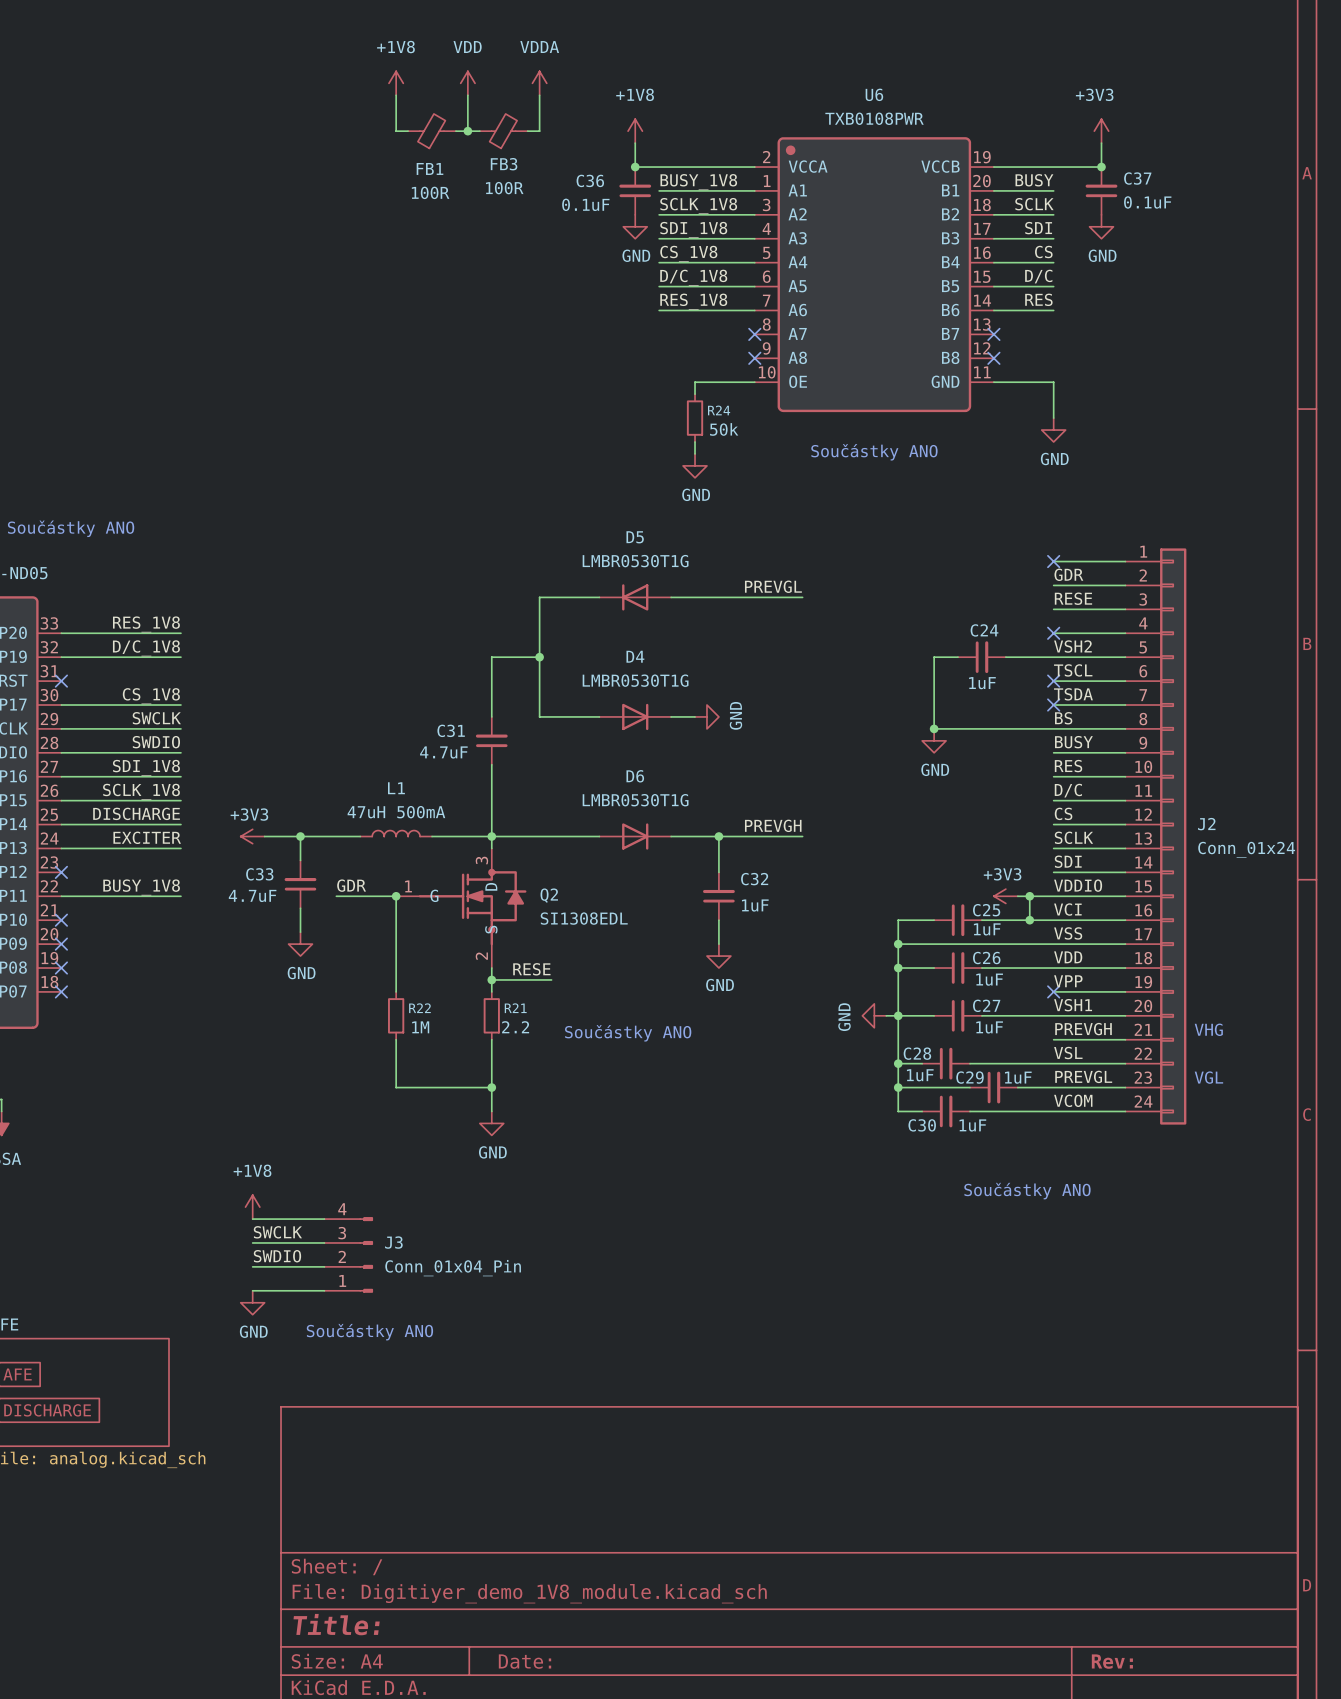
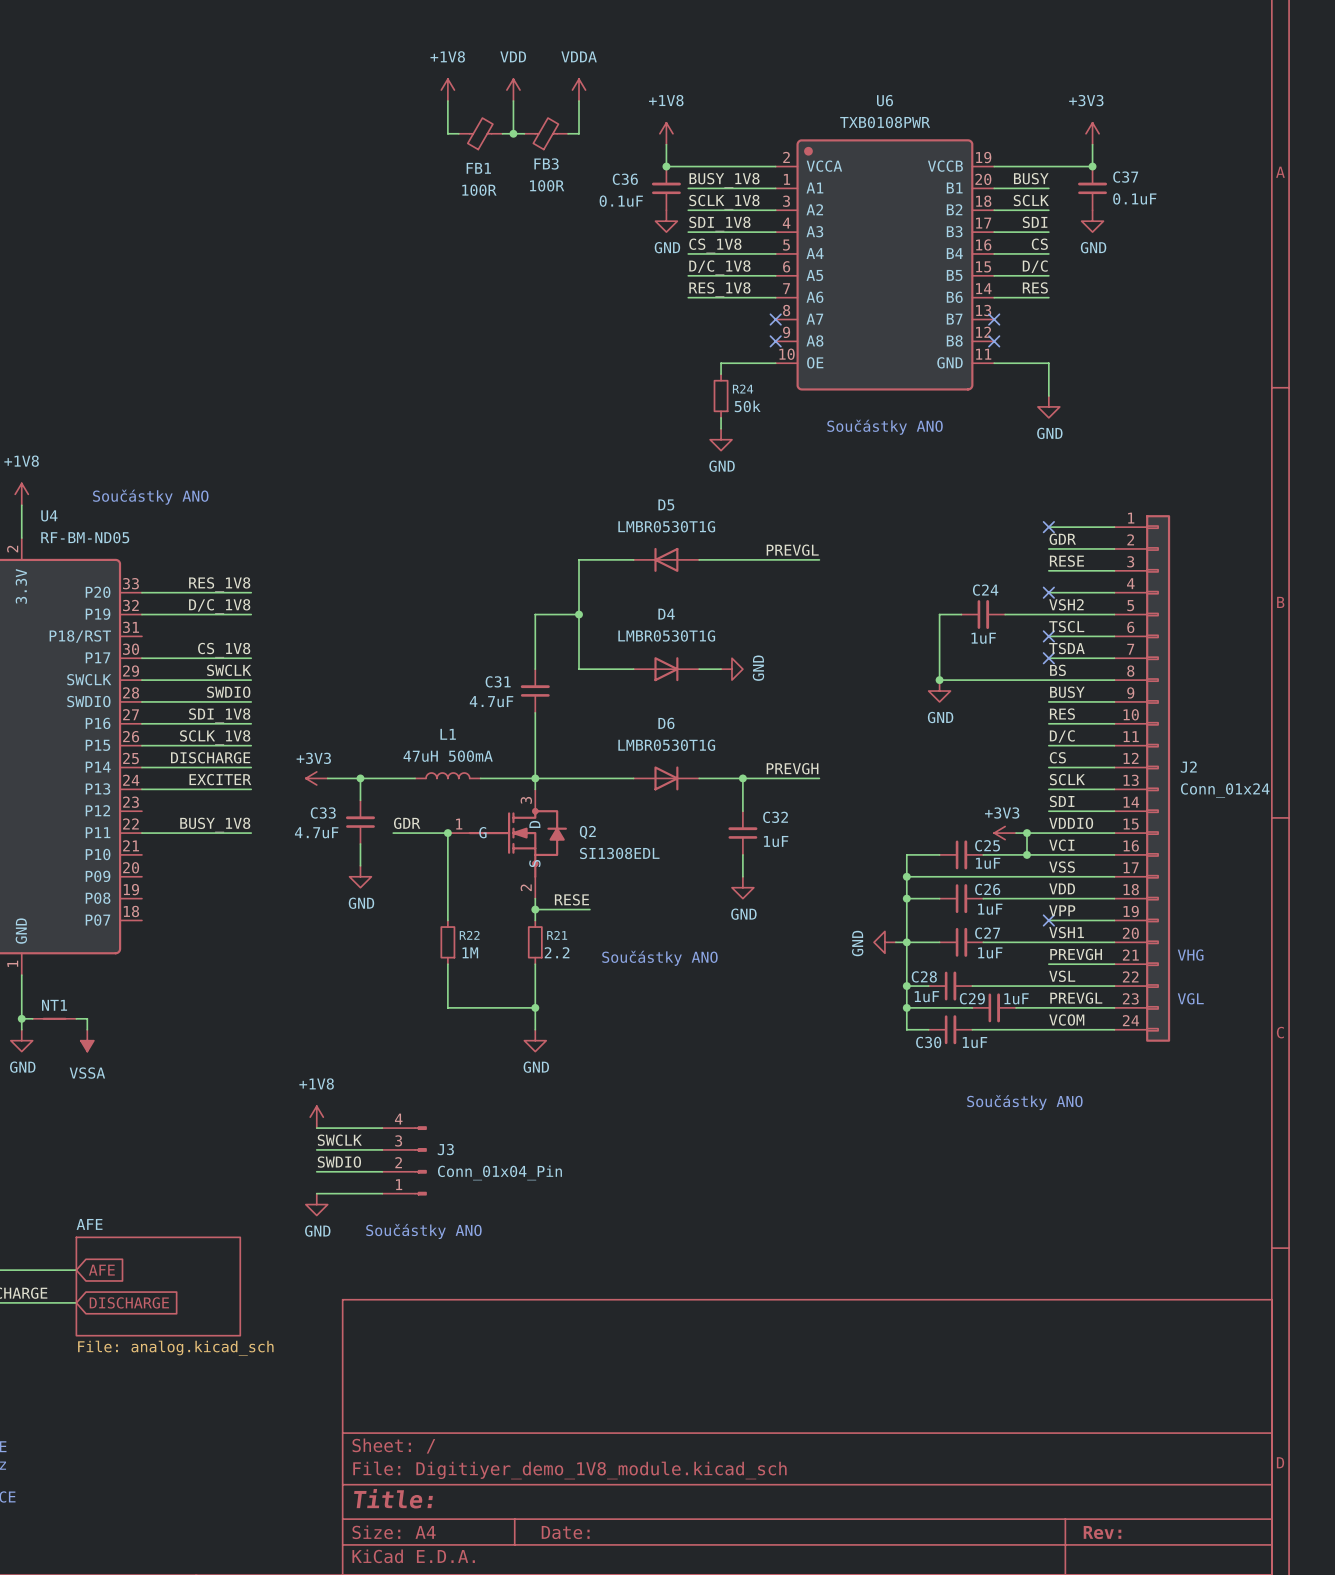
no-connect mark: (61, 681) -> none
no-connect mark: (61, 872) -> none
no-connect mark: (61, 920) -> none
no-connect mark: (61, 944) -> none
no-connect mark: (61, 968) -> none
no-connect mark: (61, 991) -> none

